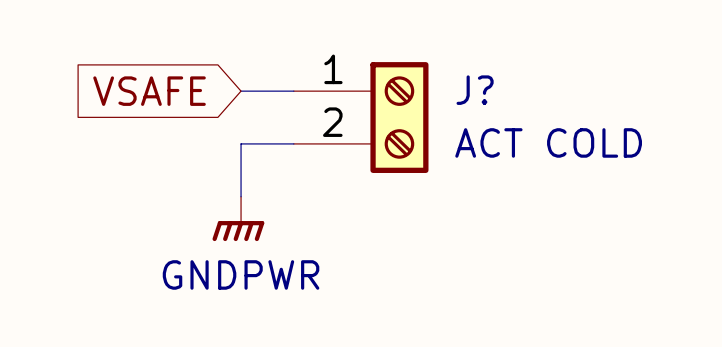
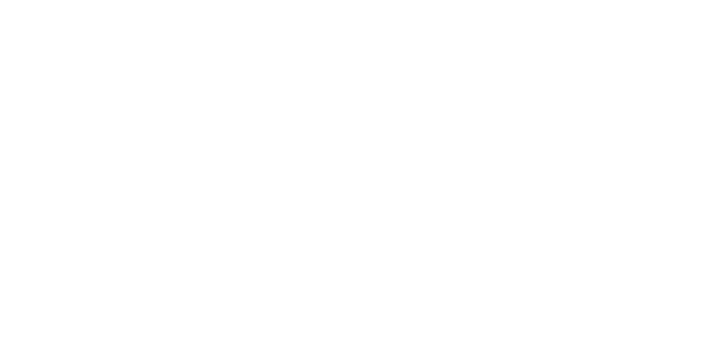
global label: VSAFE (149, 91) -> none
wire: (241, 91) (293, 91) -> none
J?: ACT COLD (361, 117) -> none
wire: (293, 143) (241, 143) (241, 196) -> none
power symbol: GNDPWR (238, 218) -> none

